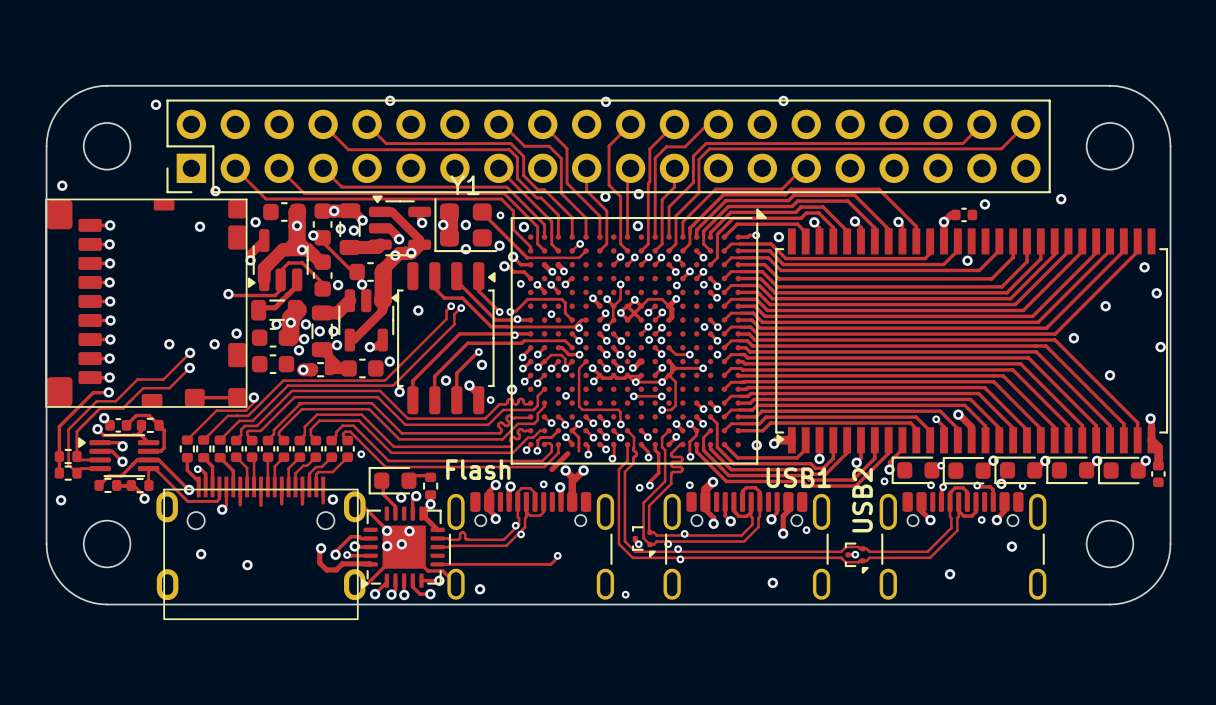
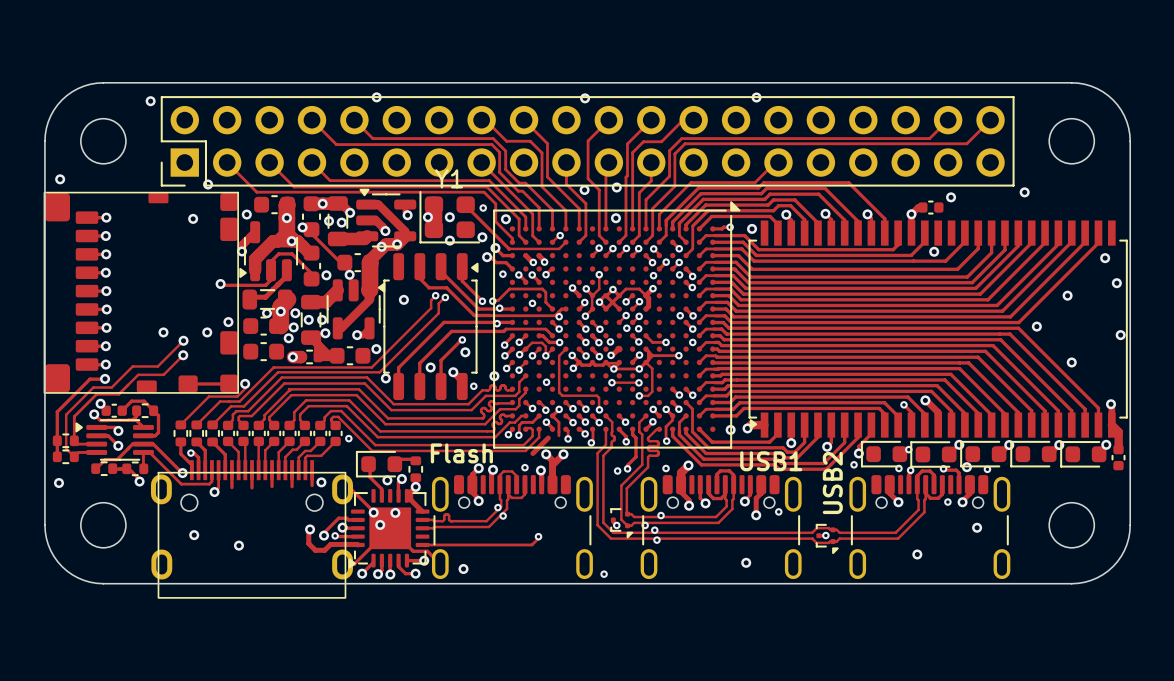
via: none -> (380, 524)
via: (401, 544) -> none
via: (387, 546) -> none

